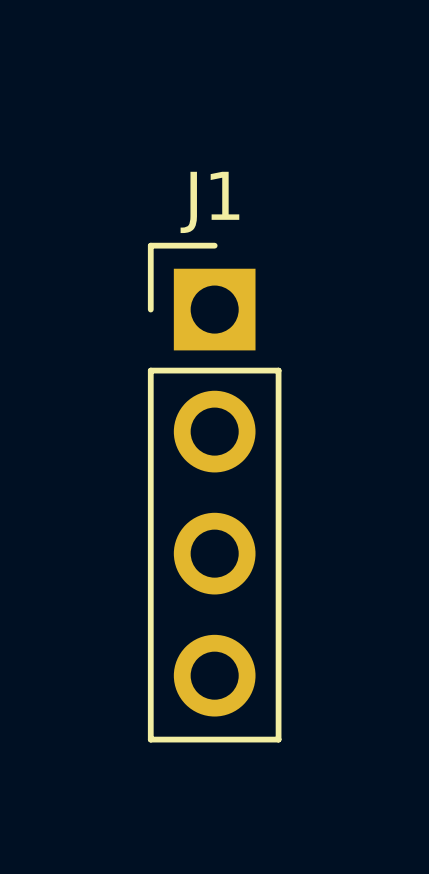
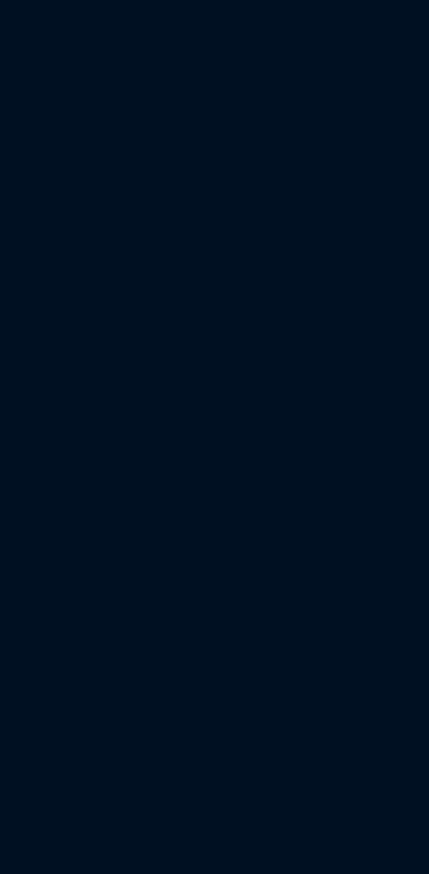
J1: (214, 492) -> none

